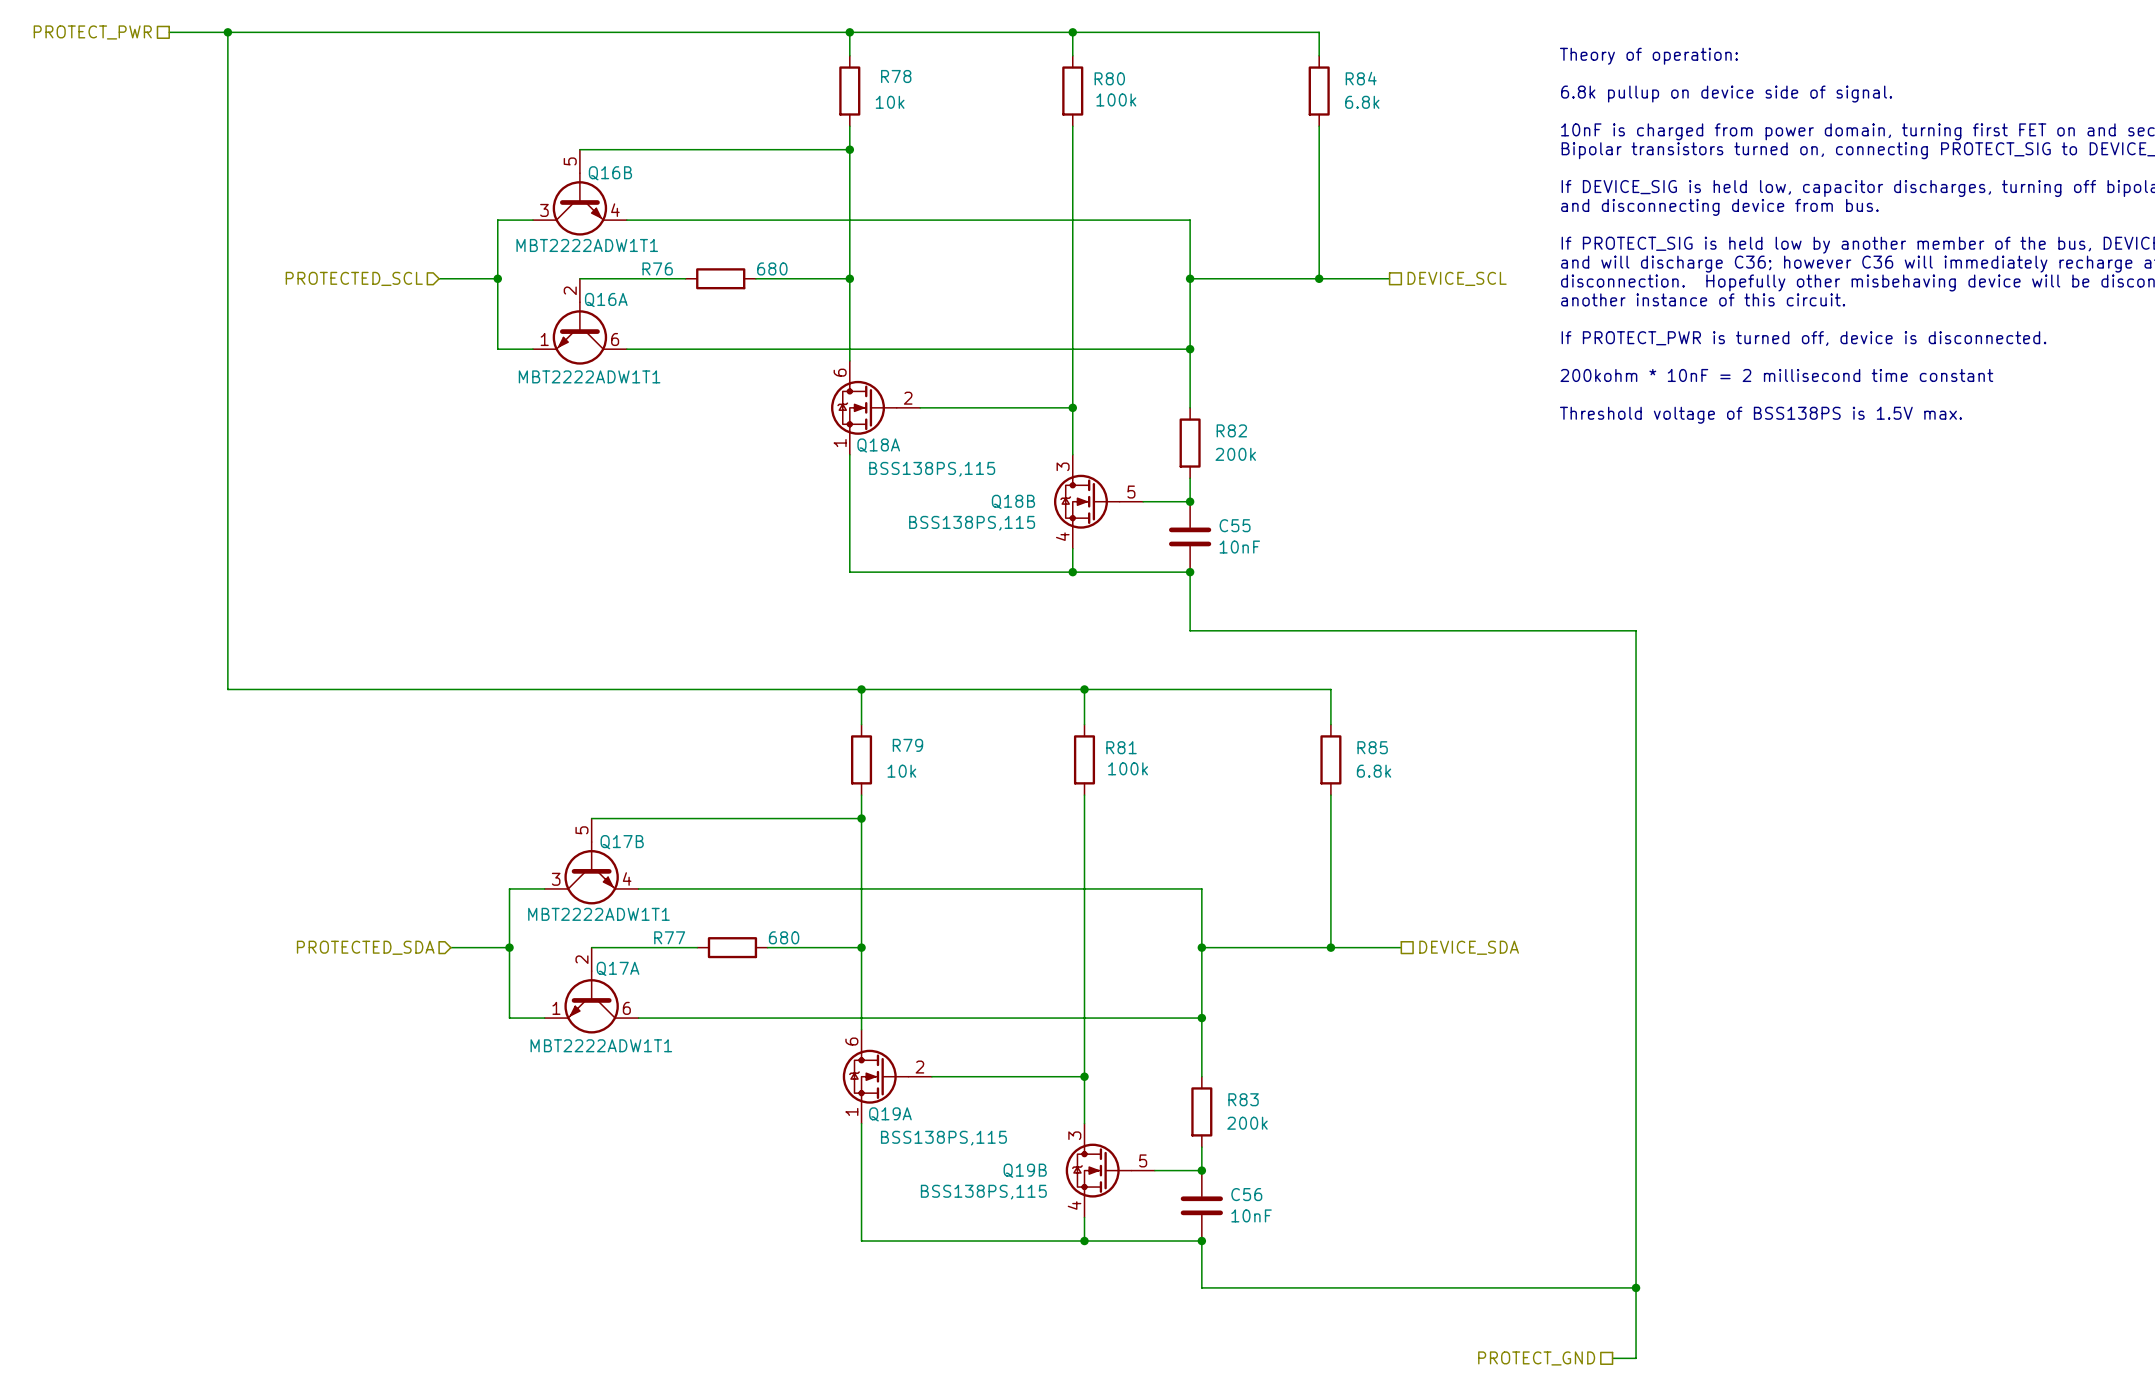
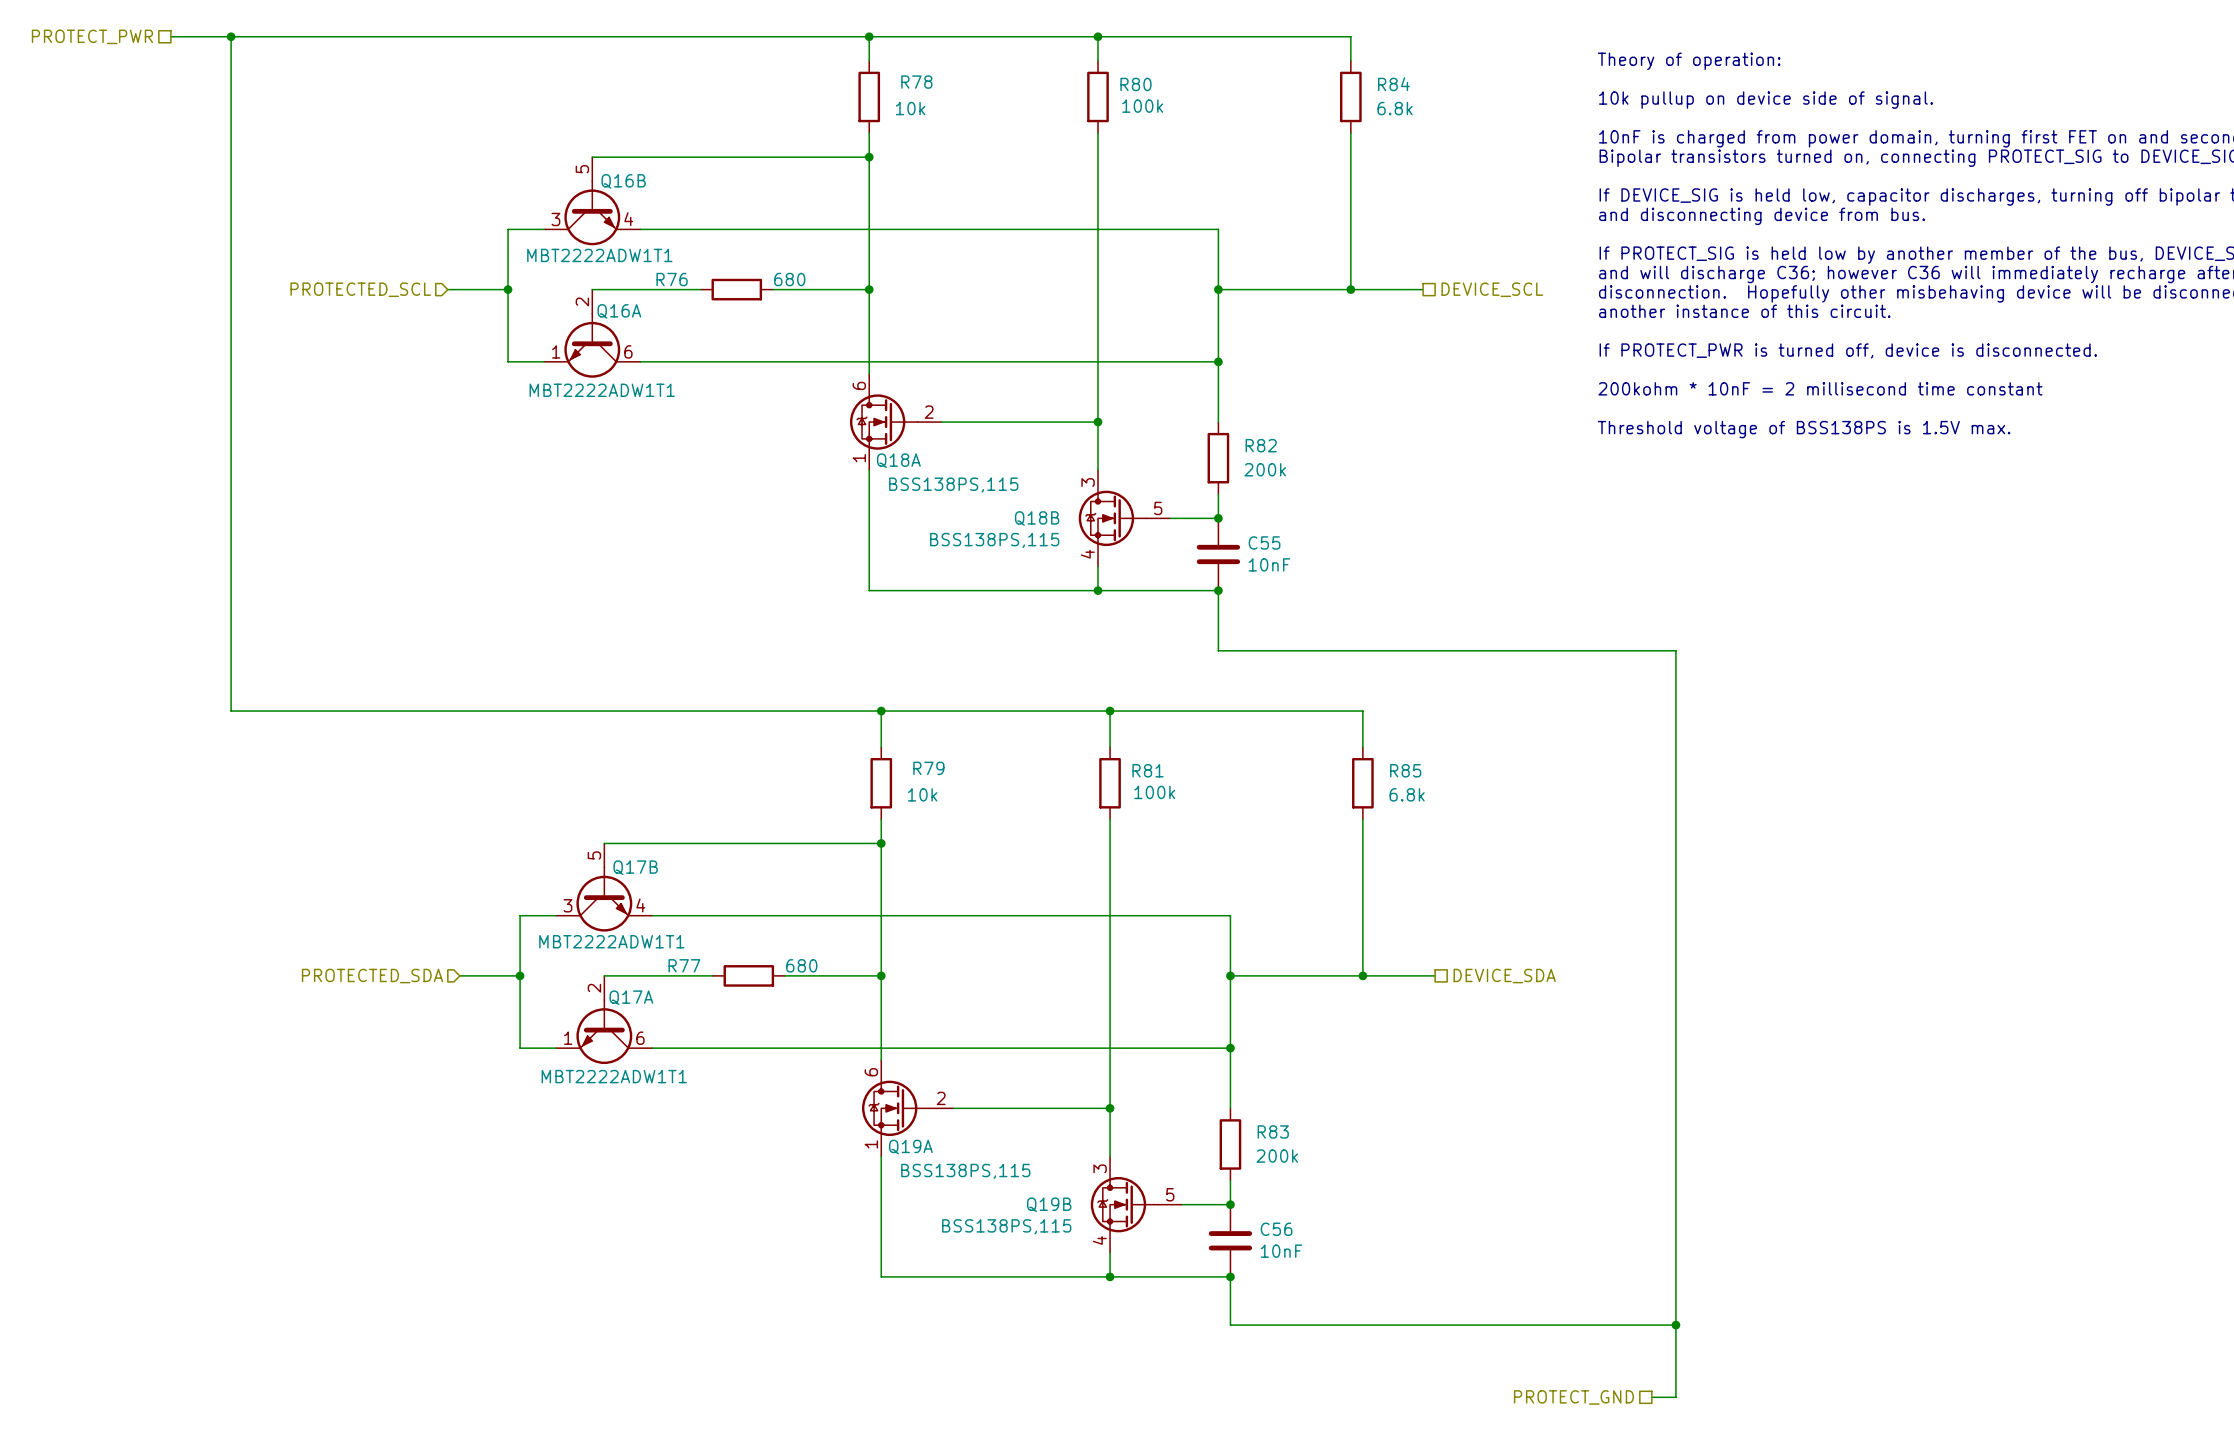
text: 6.8k pullup on device side of signal. (1726, 94) -> 10k pullup on device side of signal. (1765, 100)

